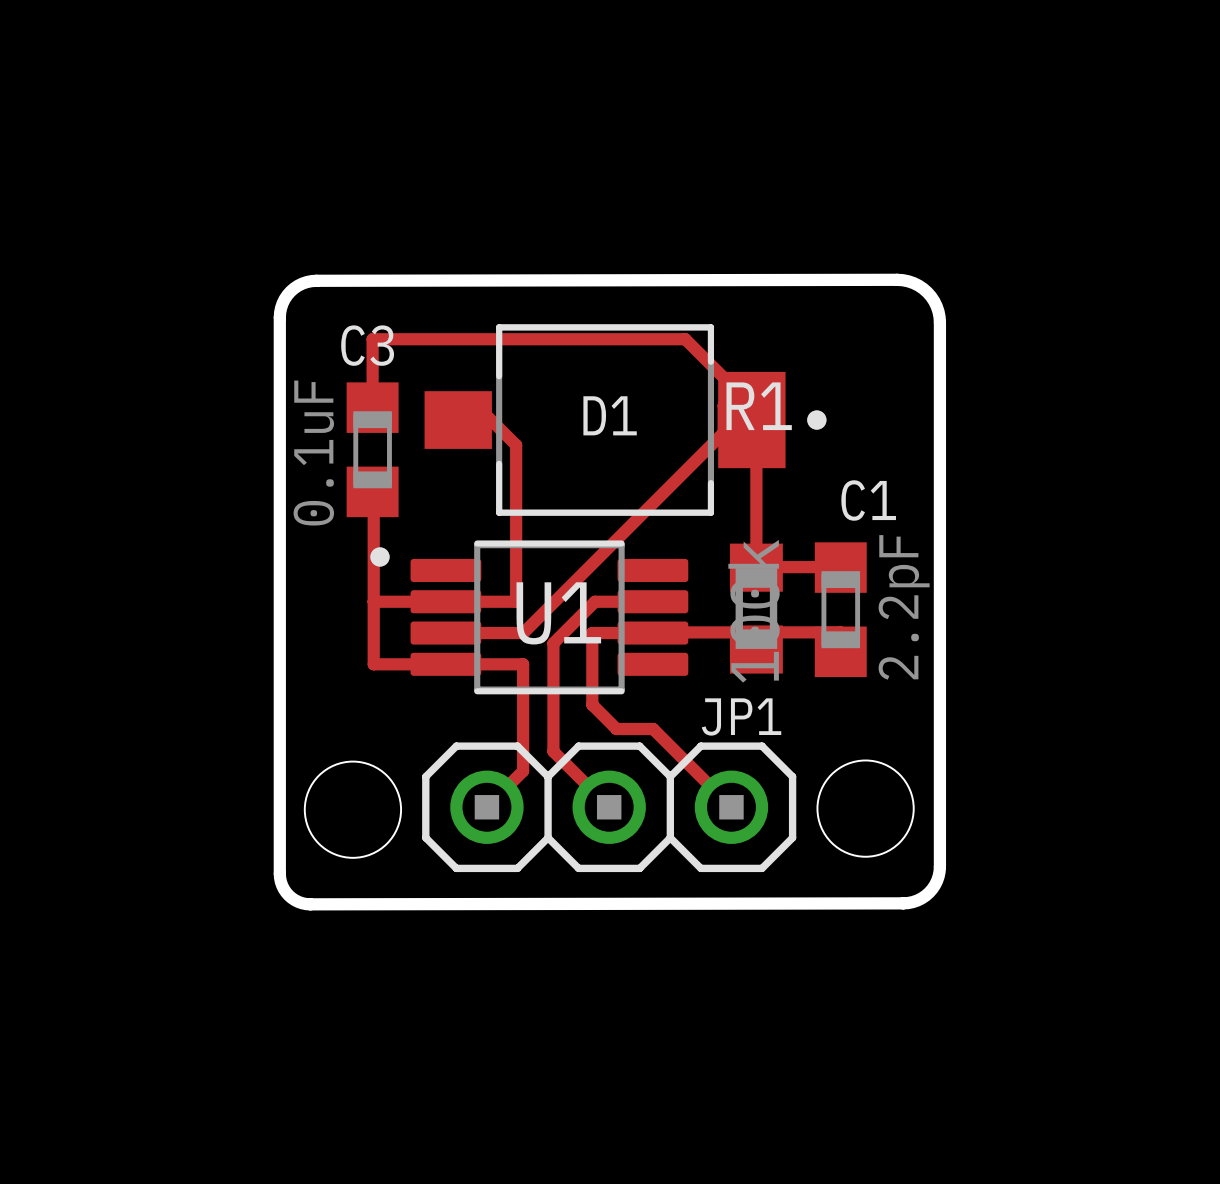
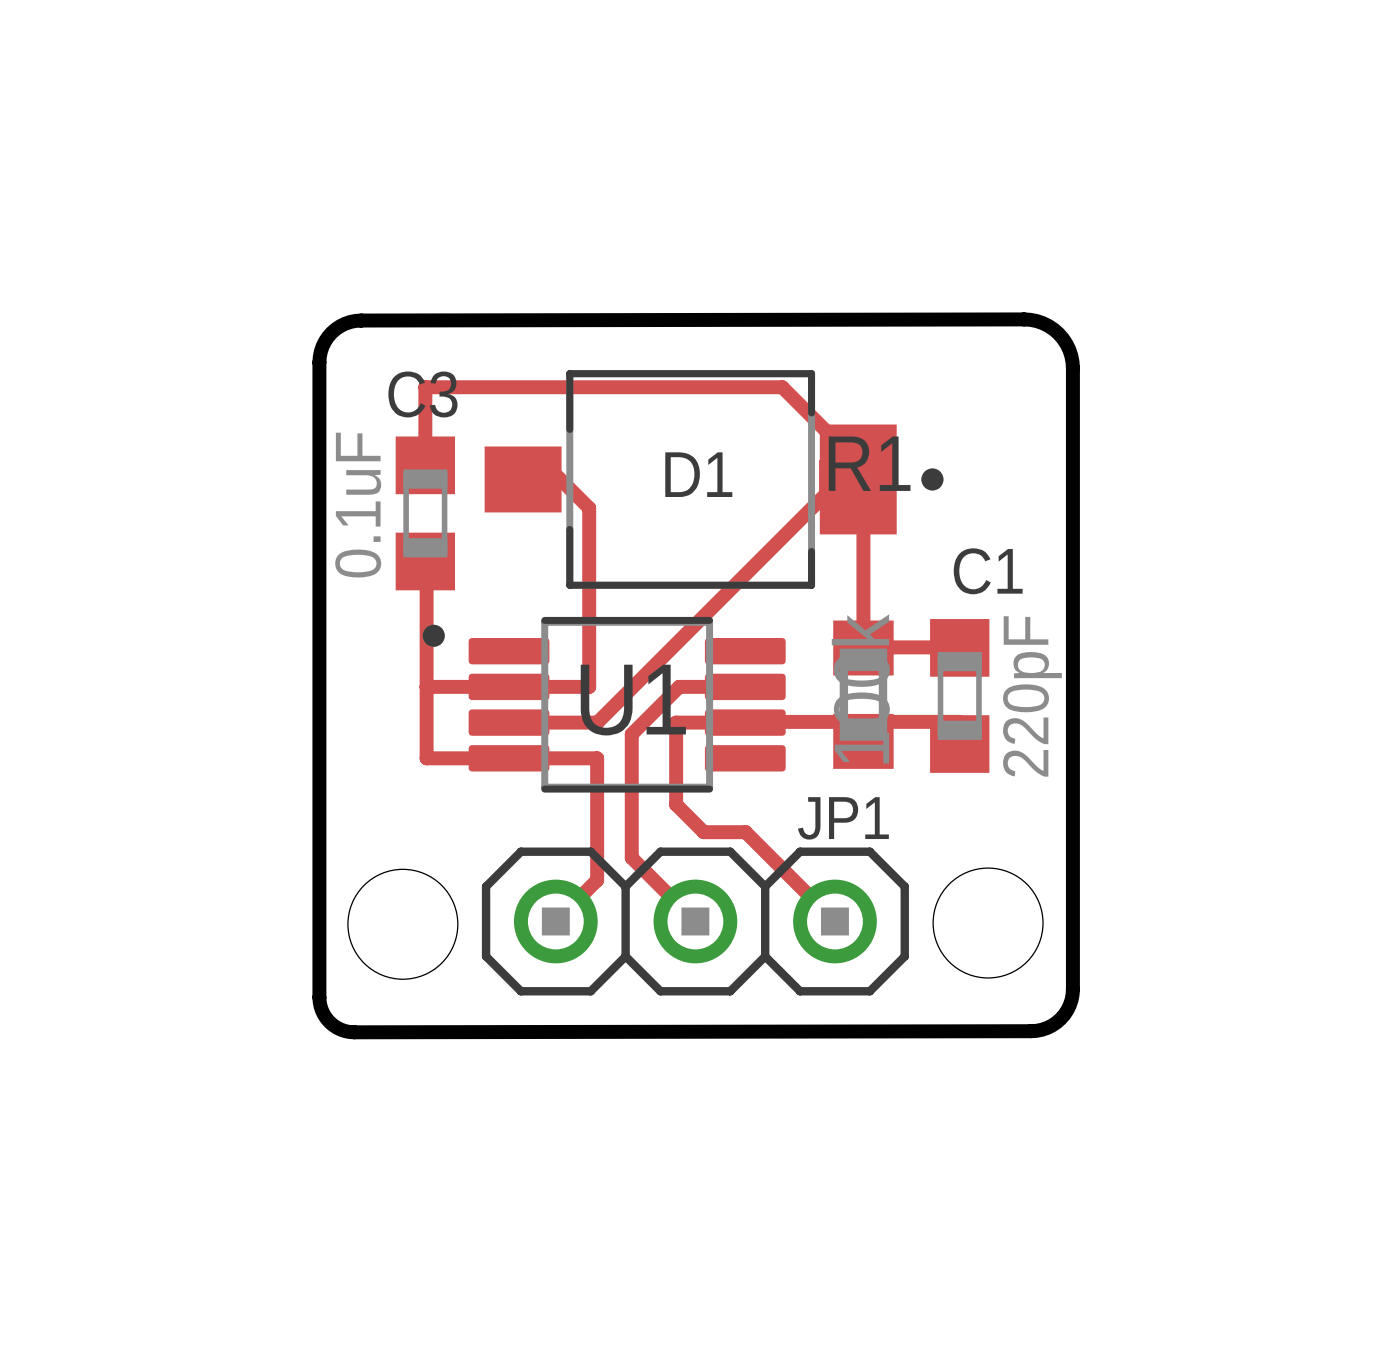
C1 value: 2.2pF (904, 607) -> 220pF (1032, 696)

